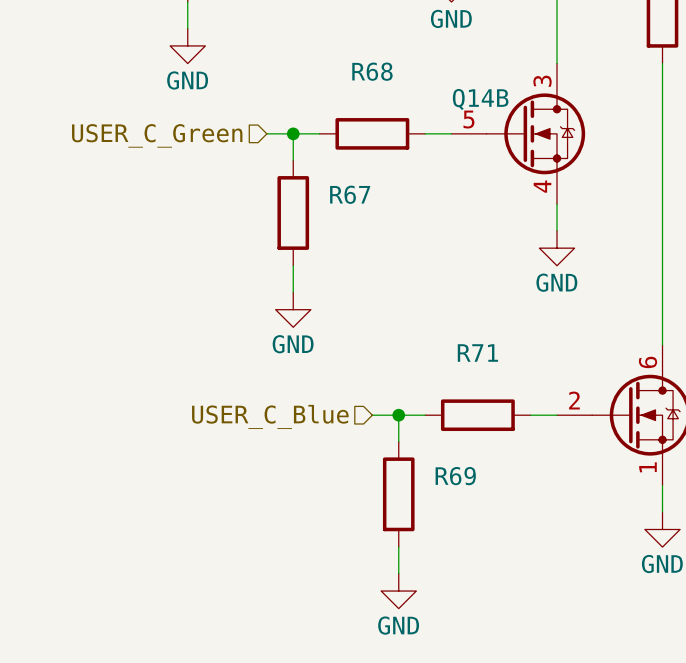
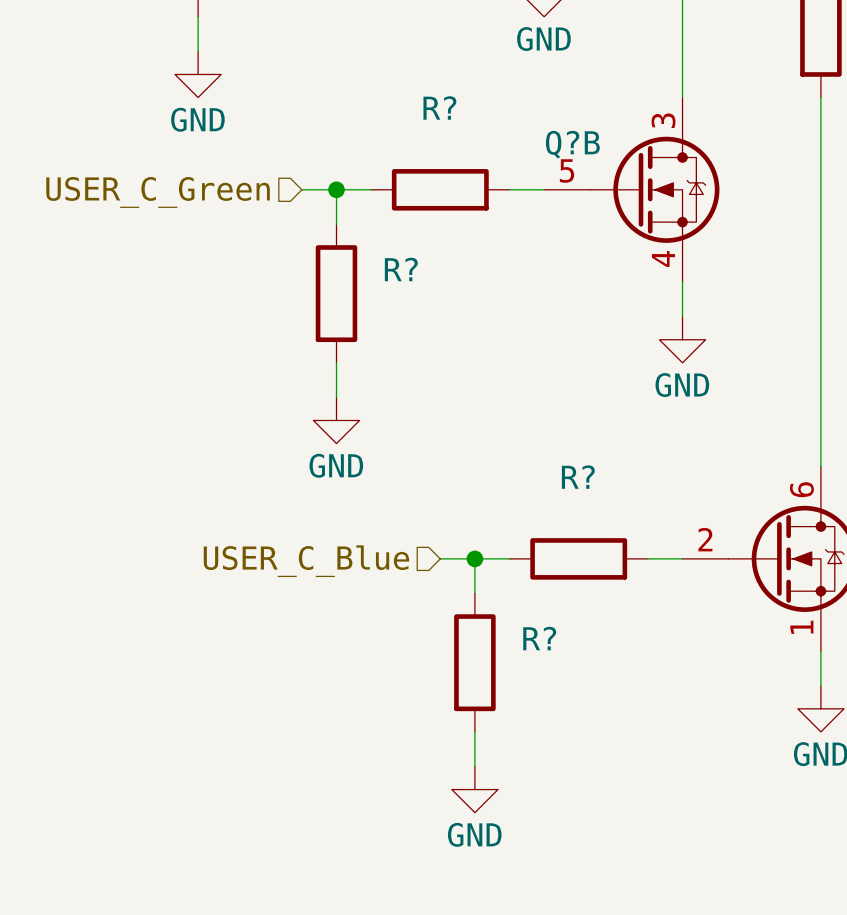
R68 name: R68 (372, 71) -> R? (439, 108)
Q14B name: Q14B (480, 99) -> Q?B (572, 144)
R67 name: R67 (350, 194) -> R? (401, 269)
R71 name: R71 (477, 353) -> R? (578, 477)
R69 name: R69 (455, 476) -> R? (539, 638)

